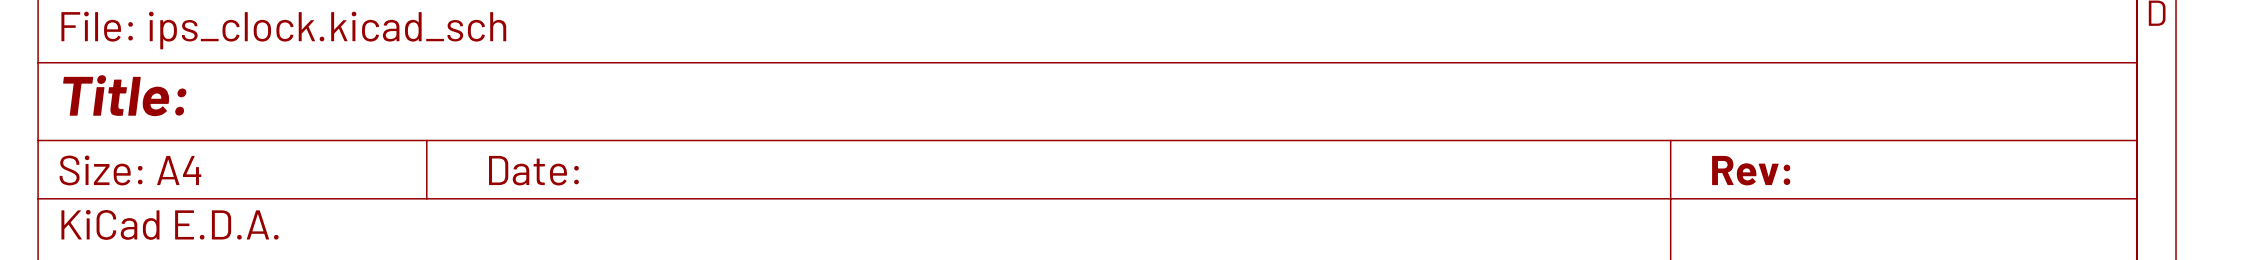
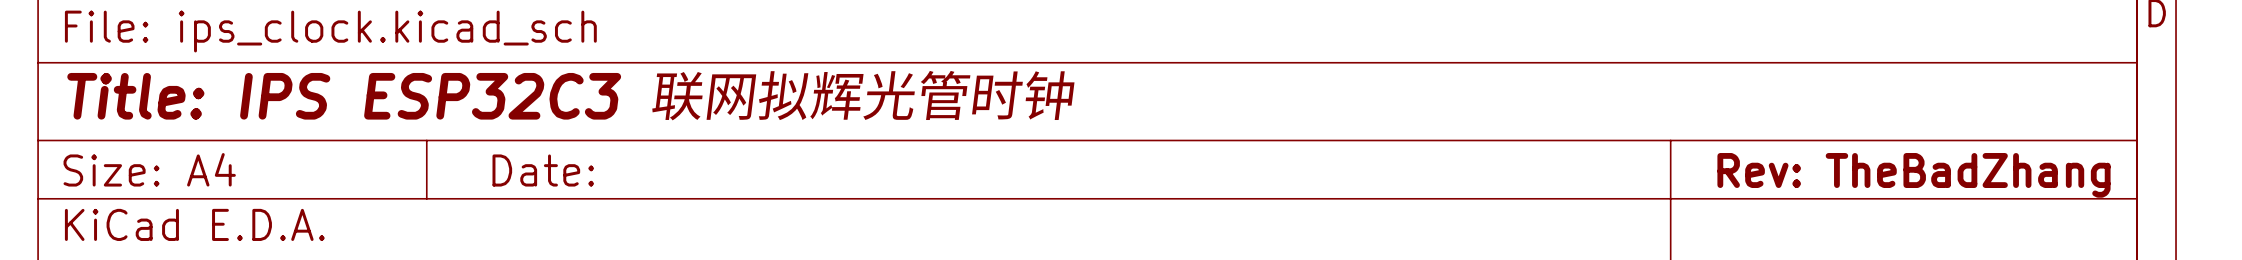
title block: Title: (124, 95) -> Title: IPS ESP32C3 联网拟辉光管时钟 (572, 95)
title block: Rev: (1751, 170) -> Rev: TheBadZhang (1913, 175)

